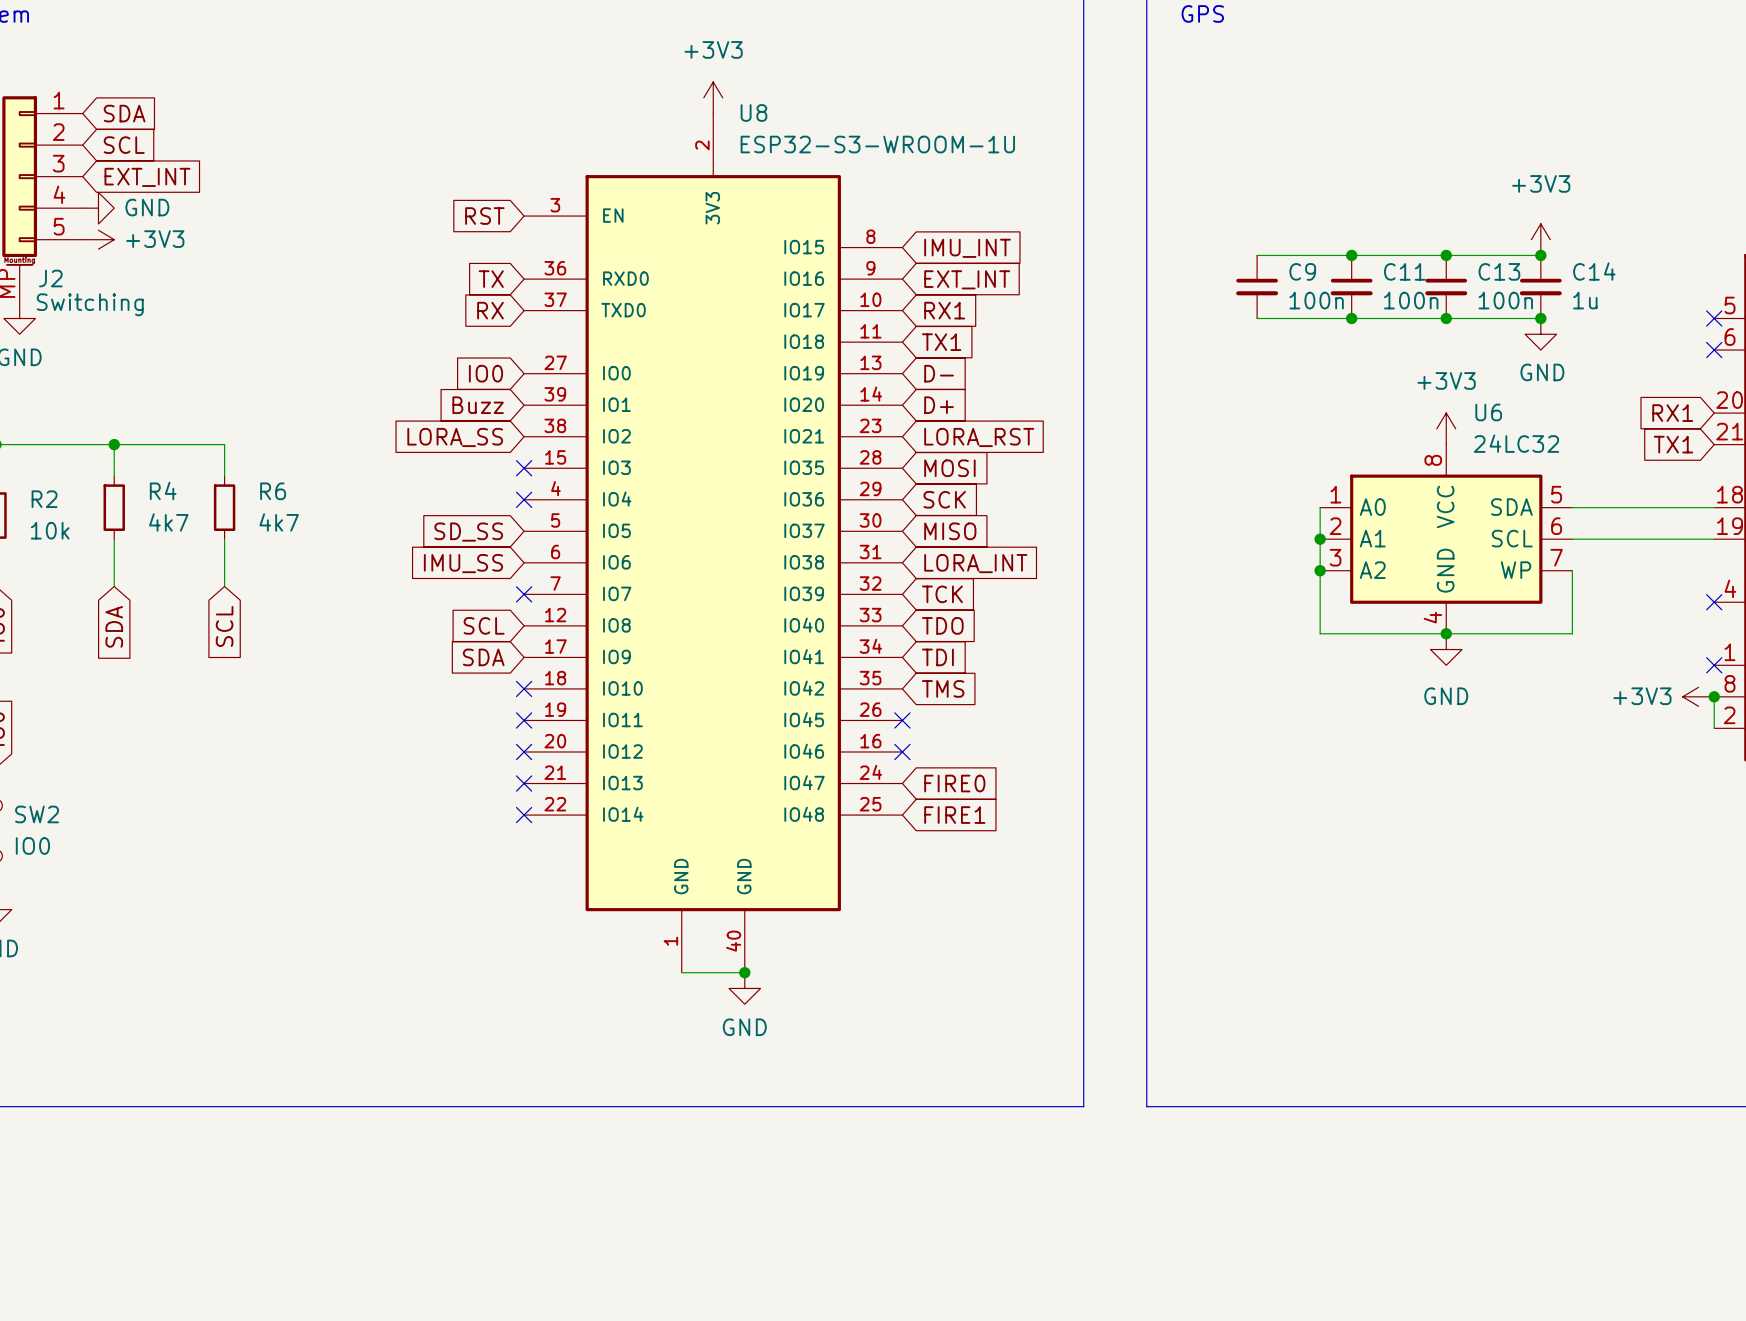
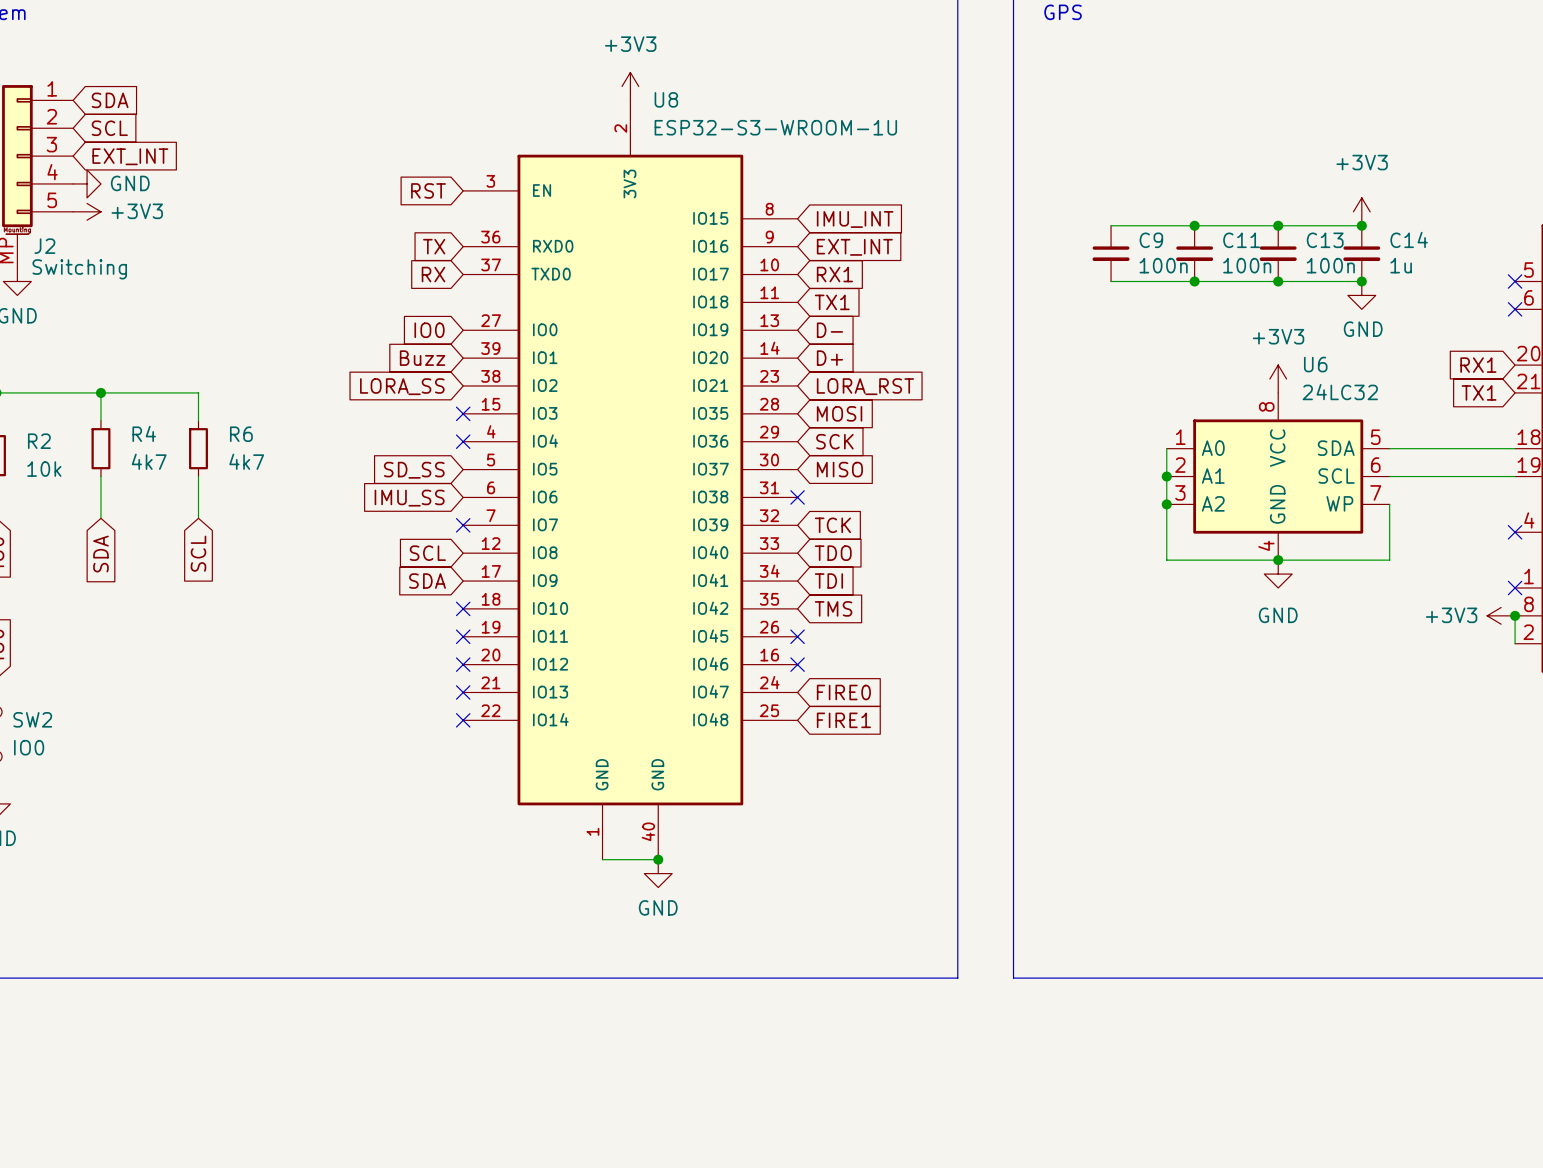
no-connect mark: none -> (797, 497)
global label: LORA_INT (975, 563) -> none

